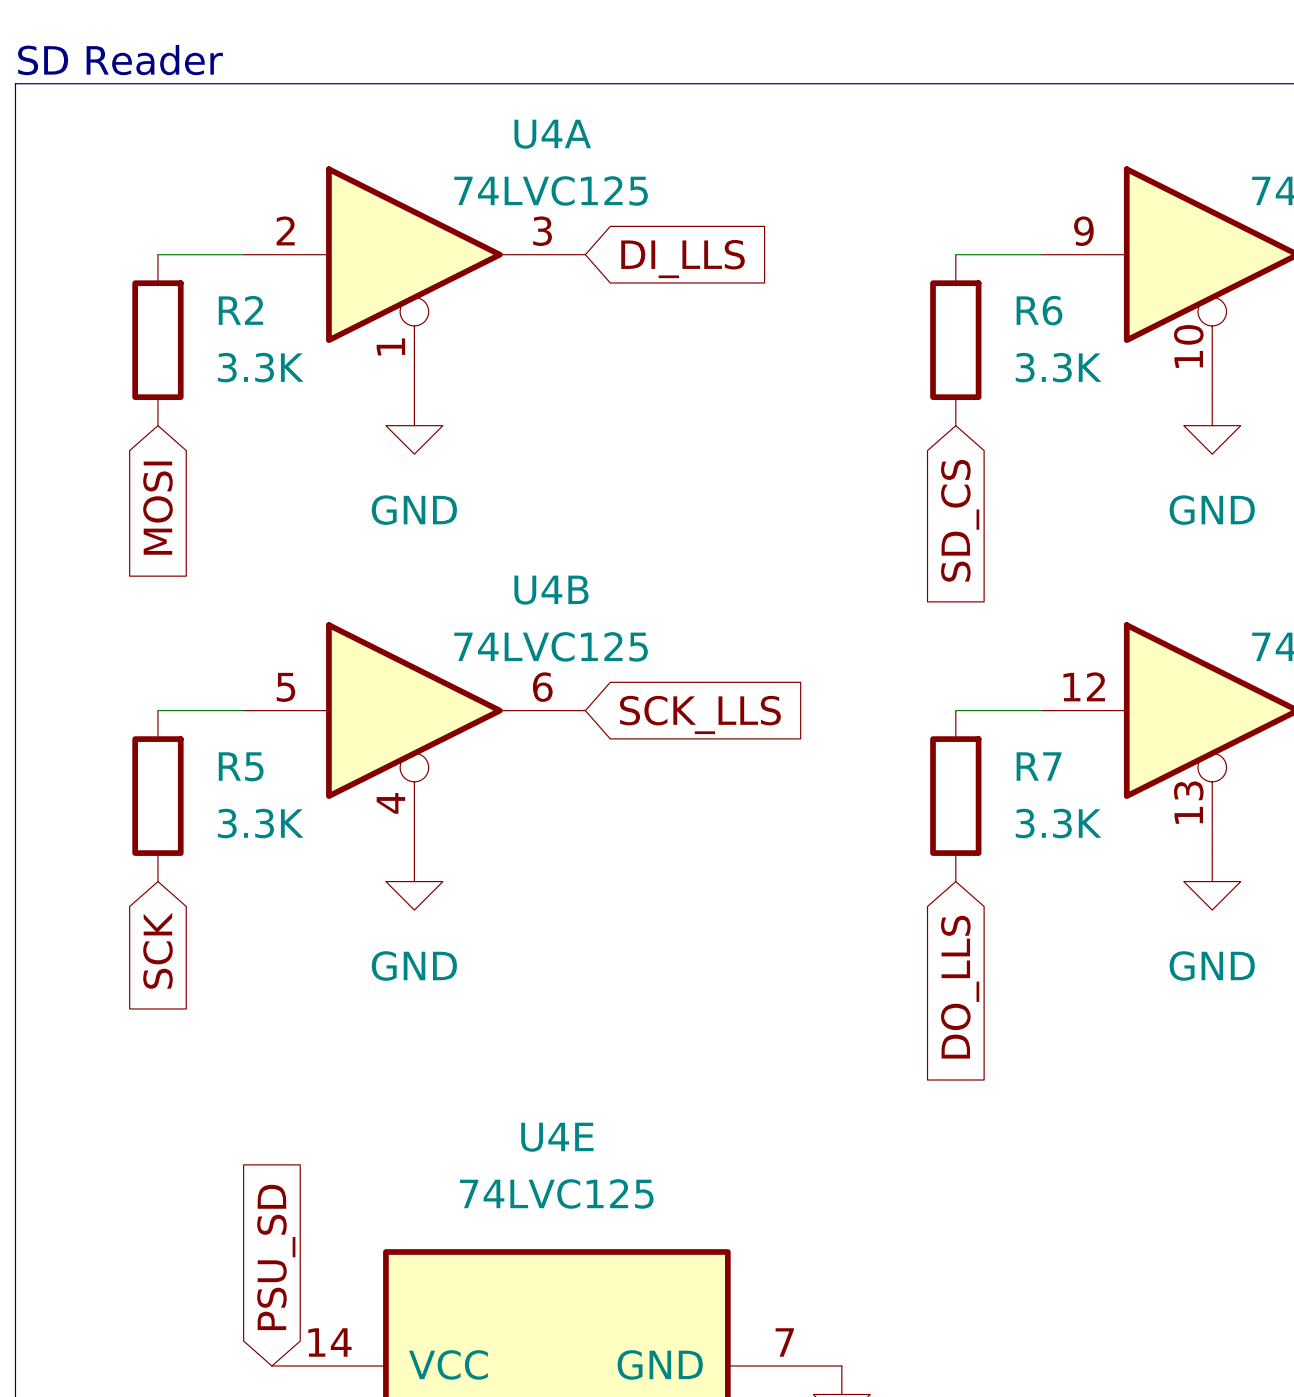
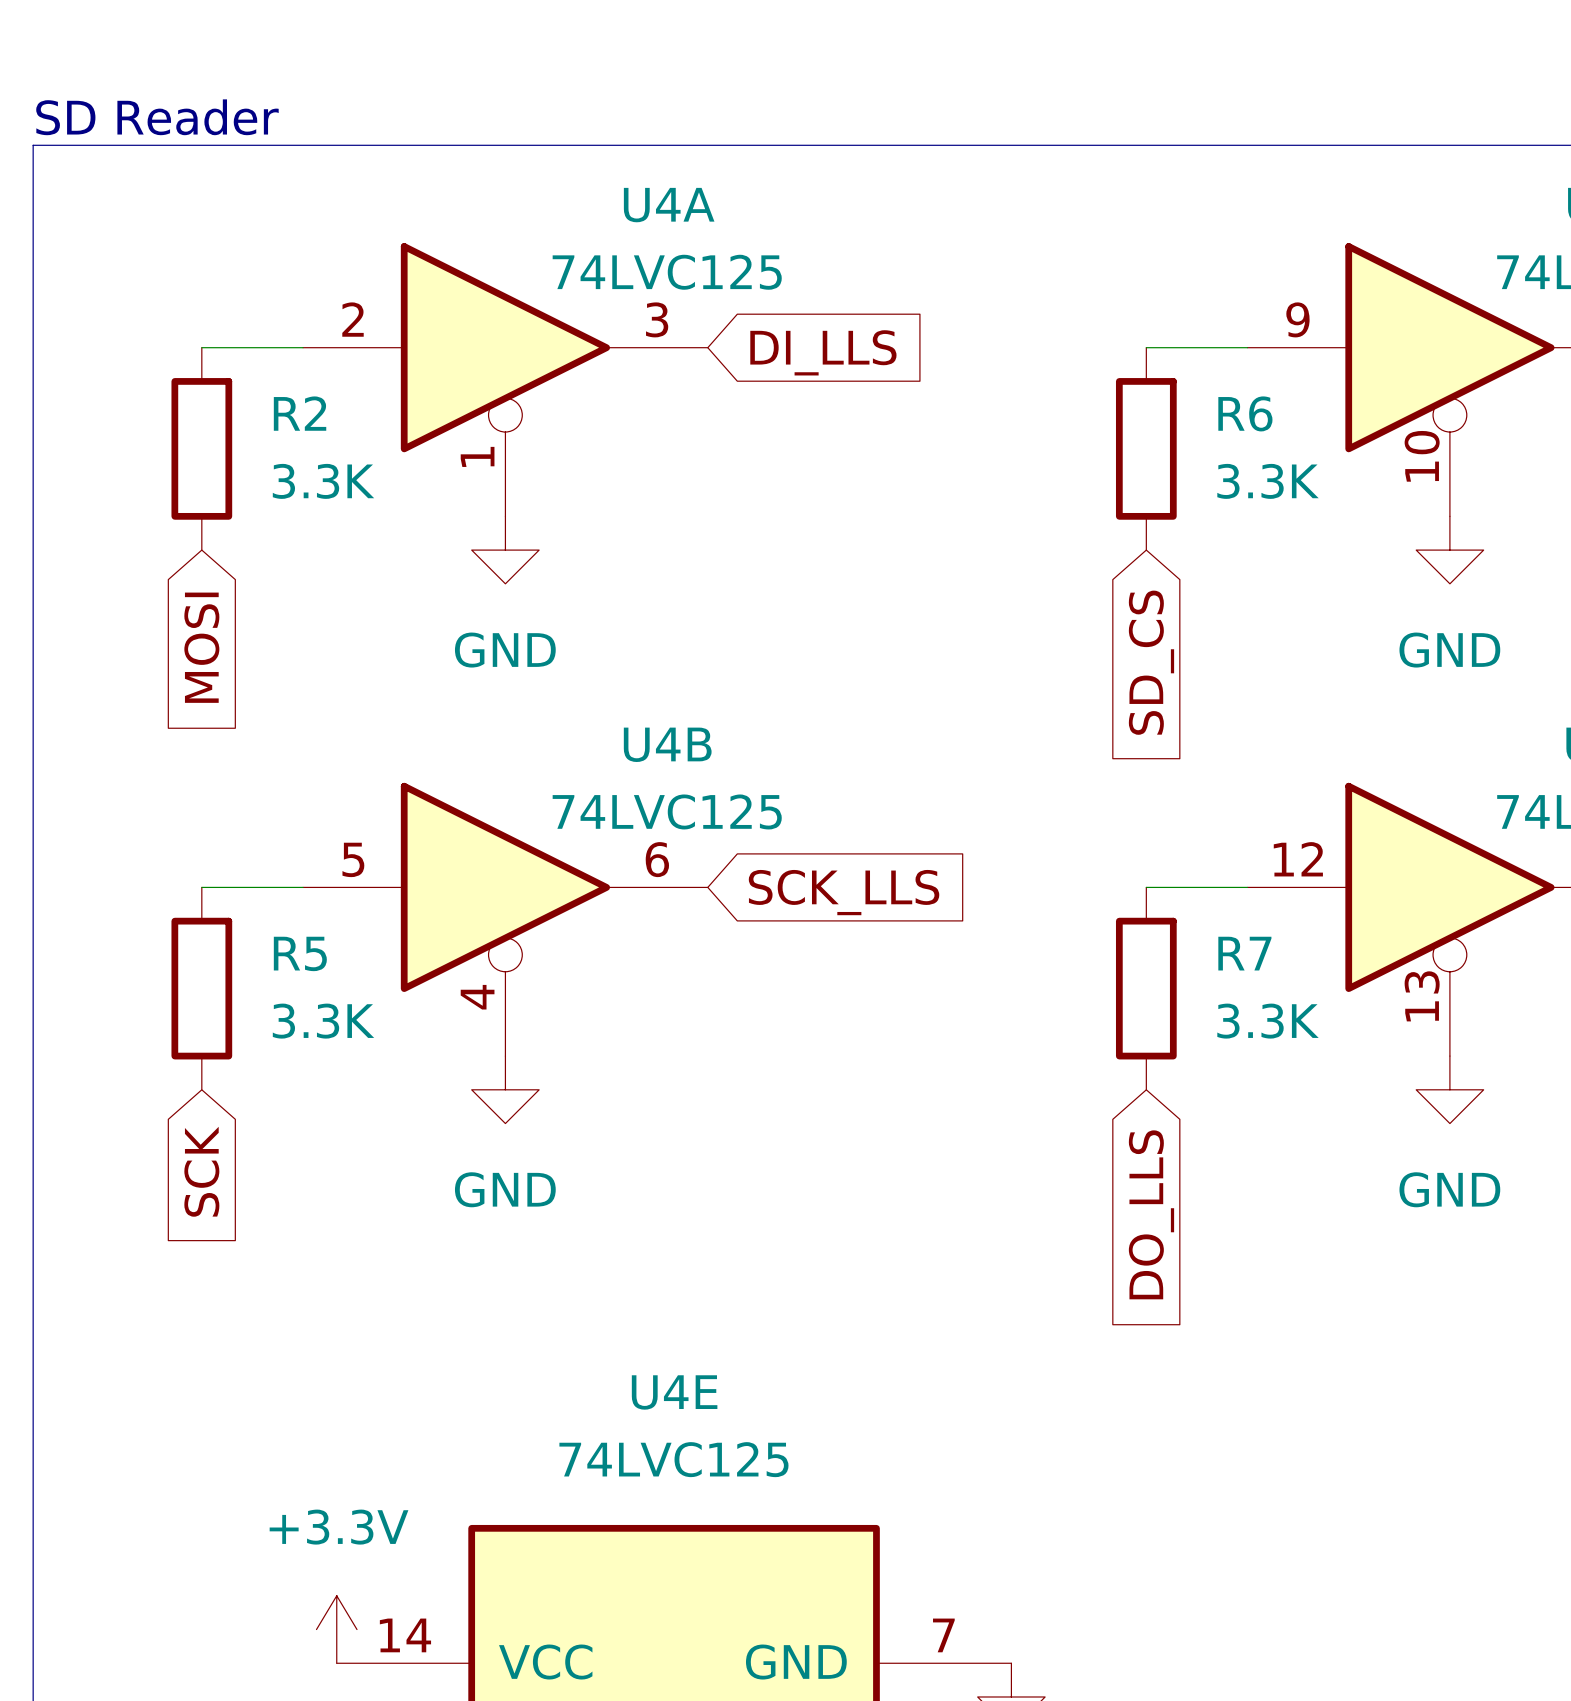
global label: PSU_SD (276, 1257) -> none
power symbol: none -> +3.3V (336, 1629)

